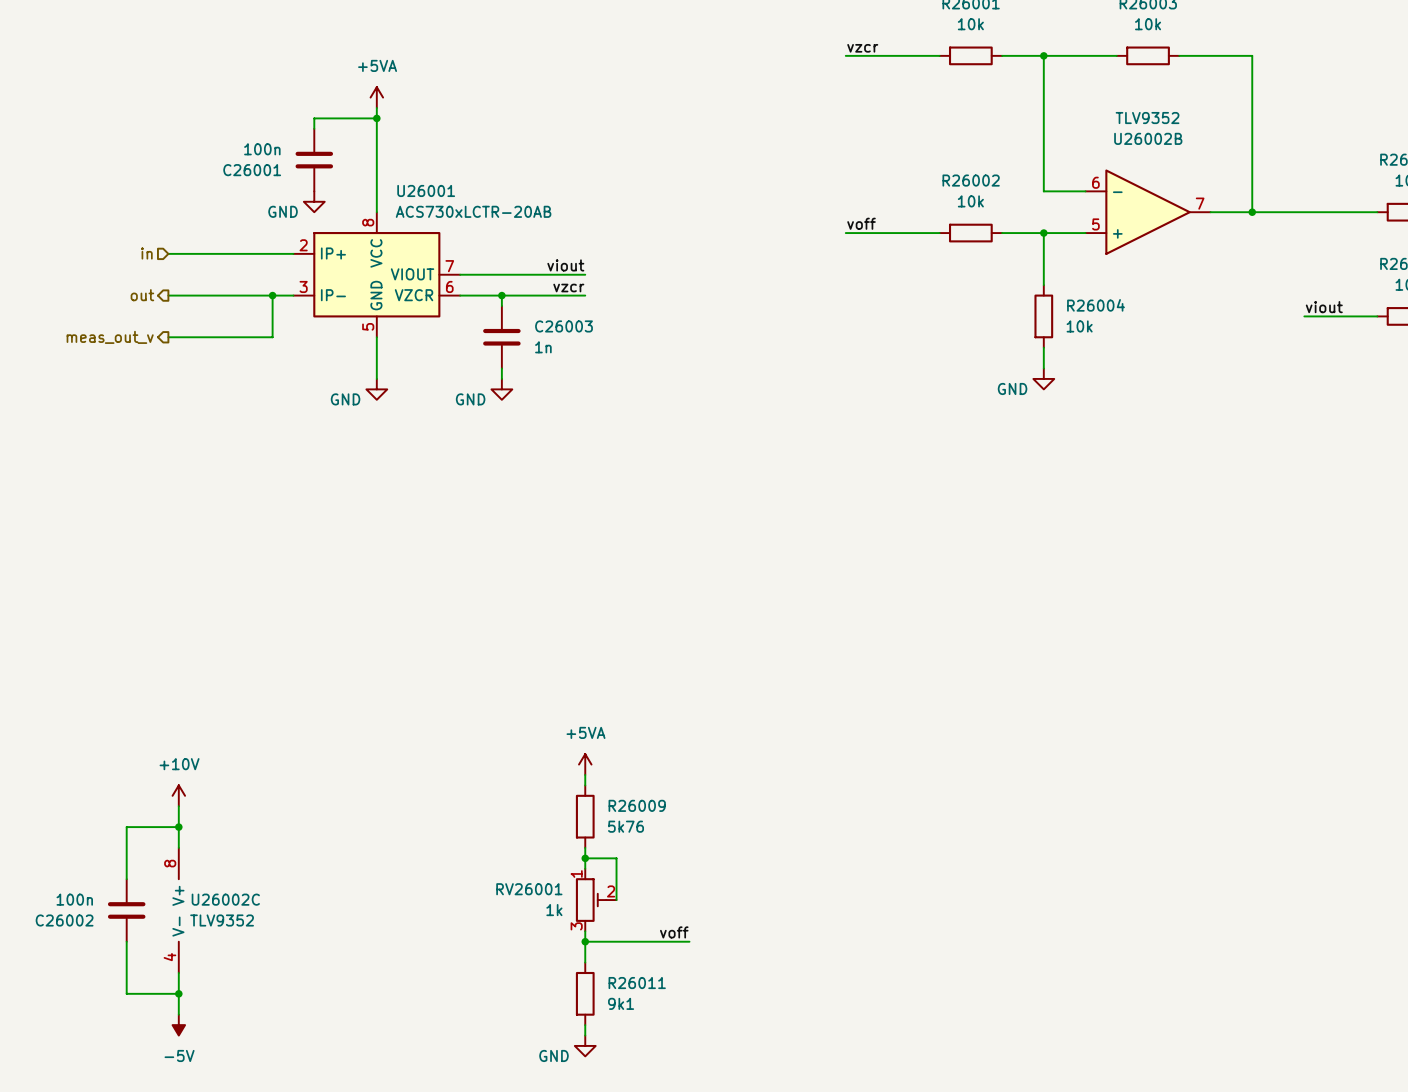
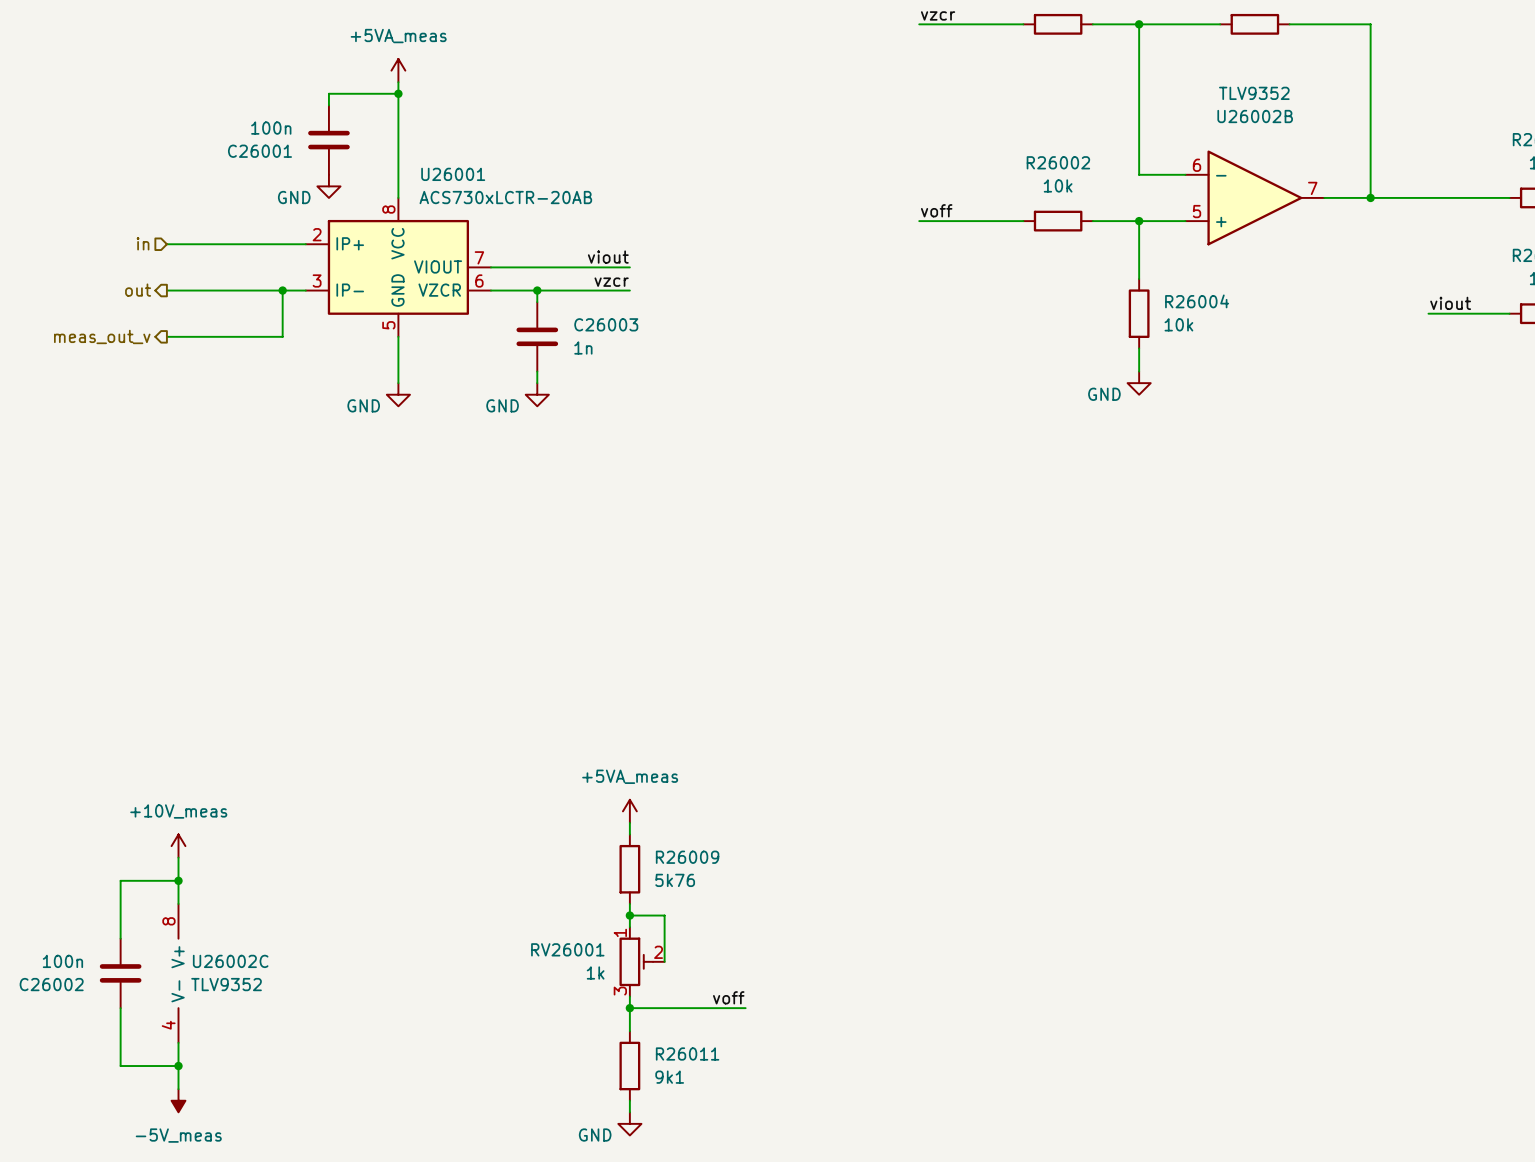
power symbol: +5VA (376, 97) -> +5VA_meas (398, 70)
power symbol: +5VA (585, 764) -> +5VA_meas (629, 811)
power symbol: +10V (178, 795) -> +10V_meas (178, 846)
power symbol: -5V (178, 1025) -> -5V_meas (178, 1100)

